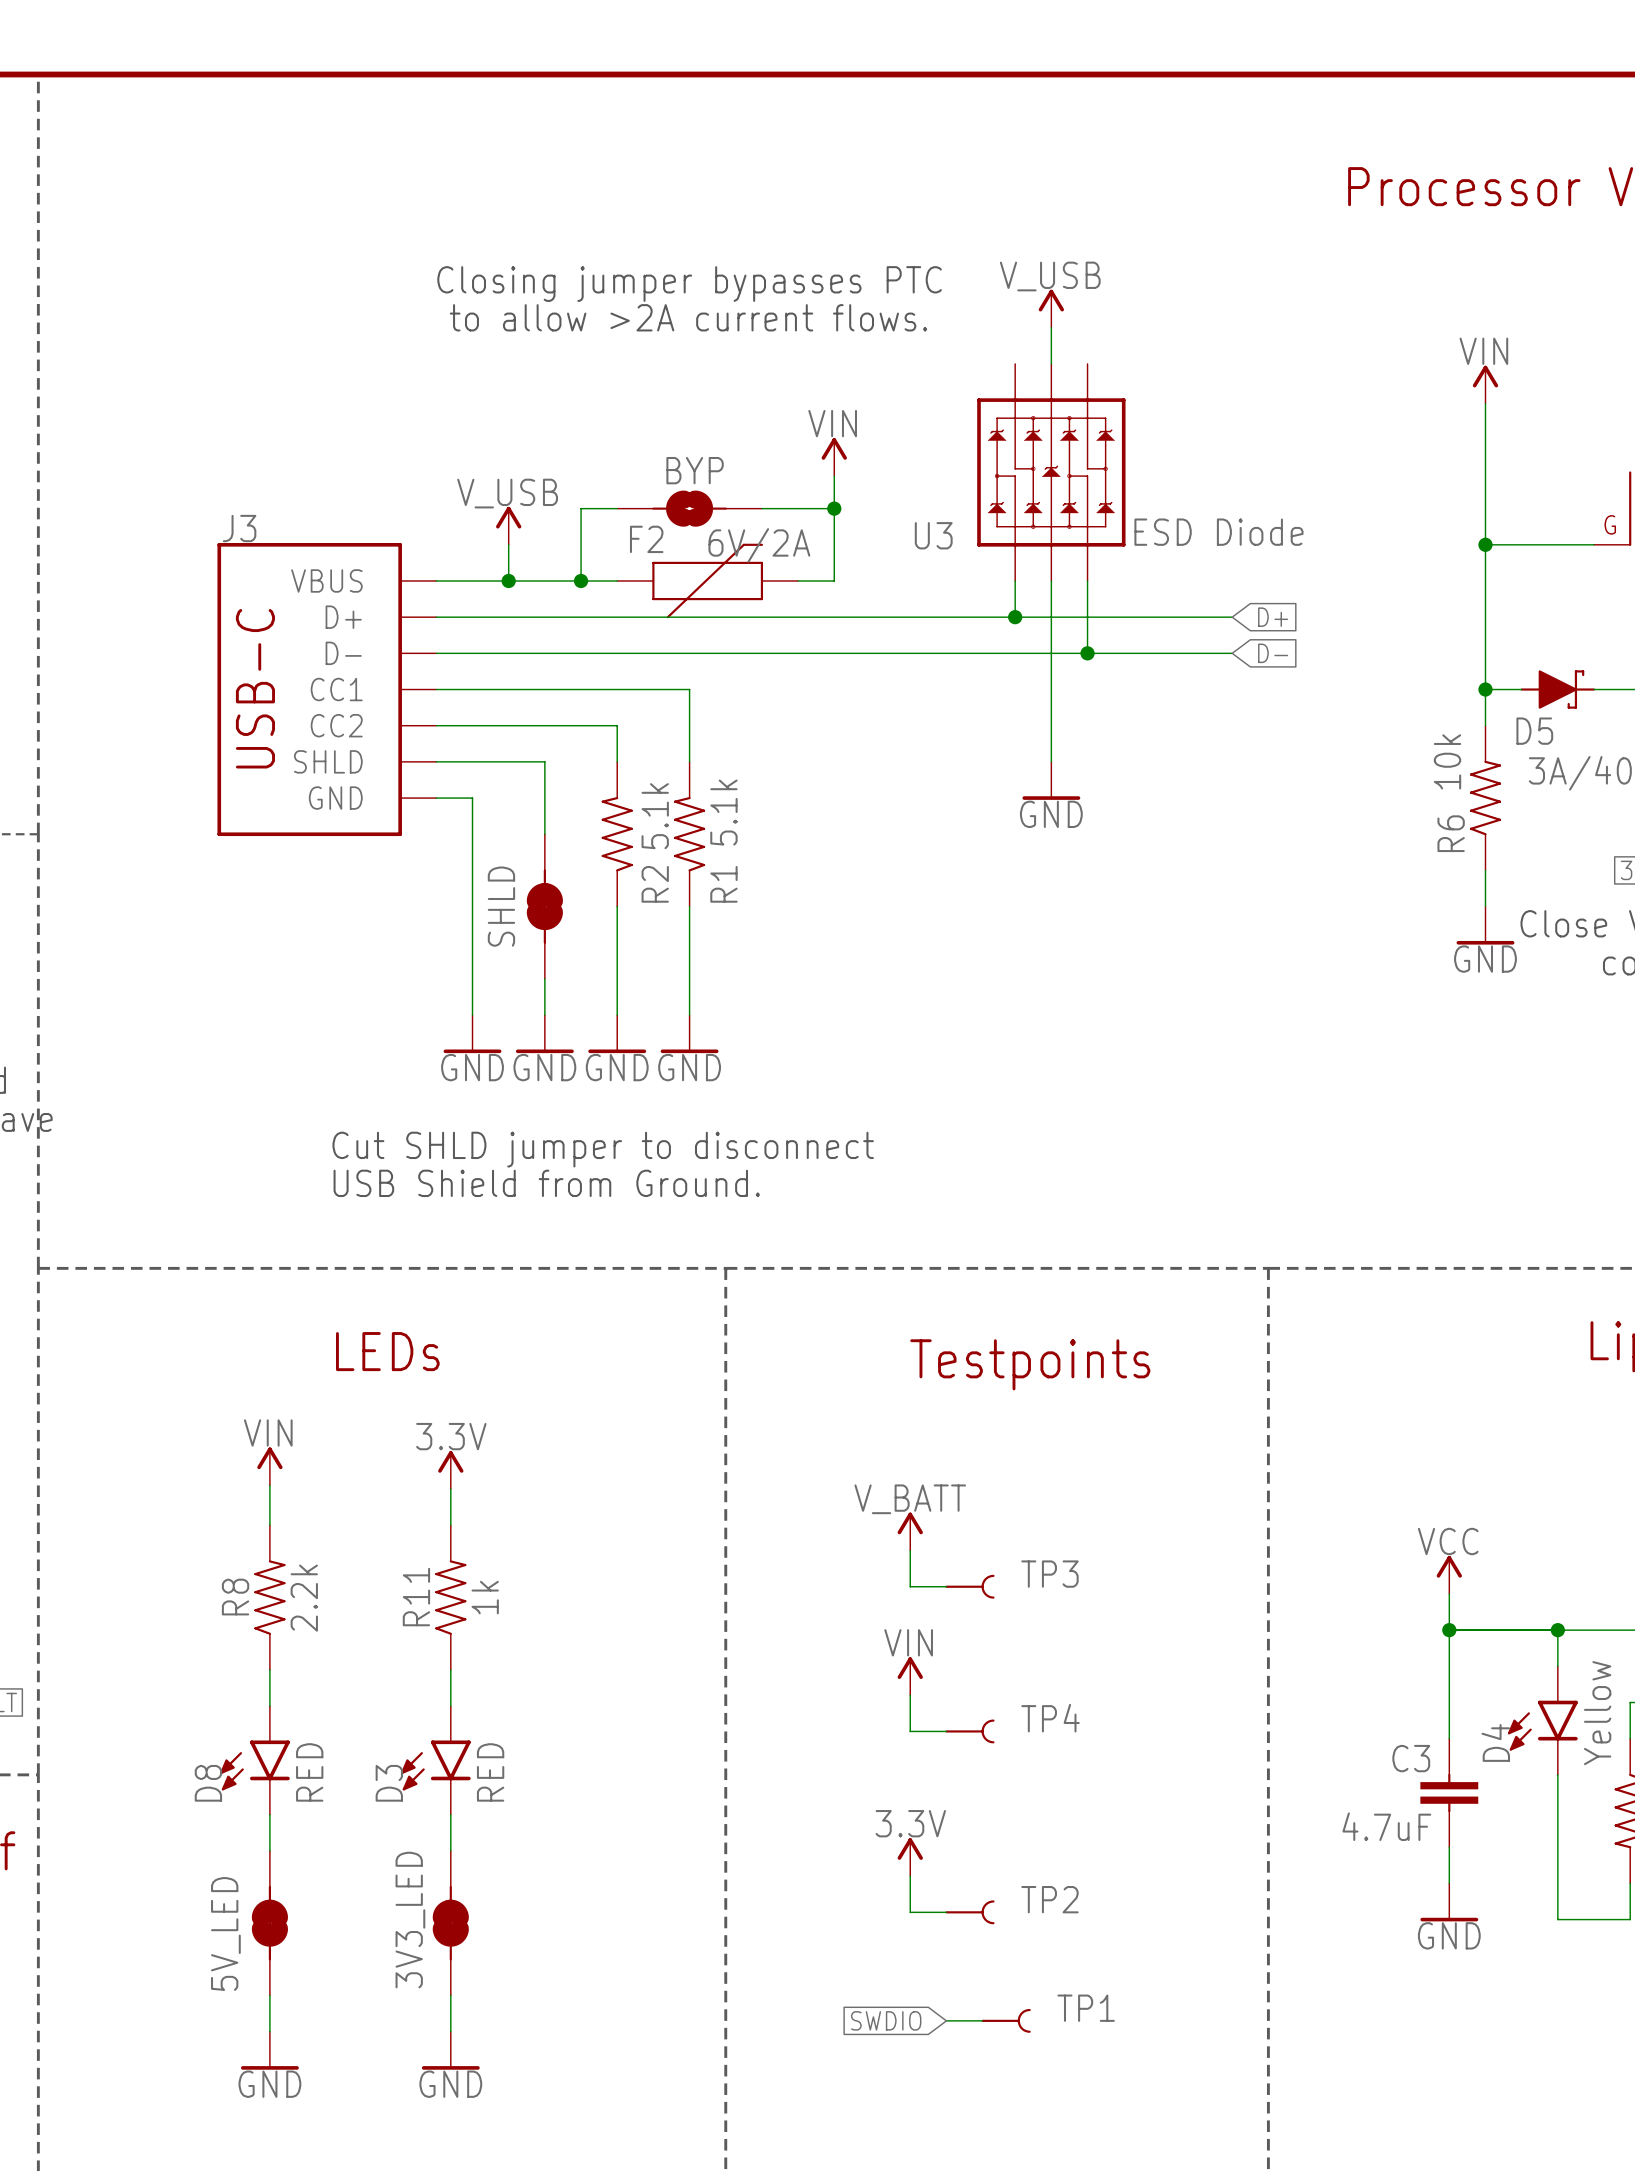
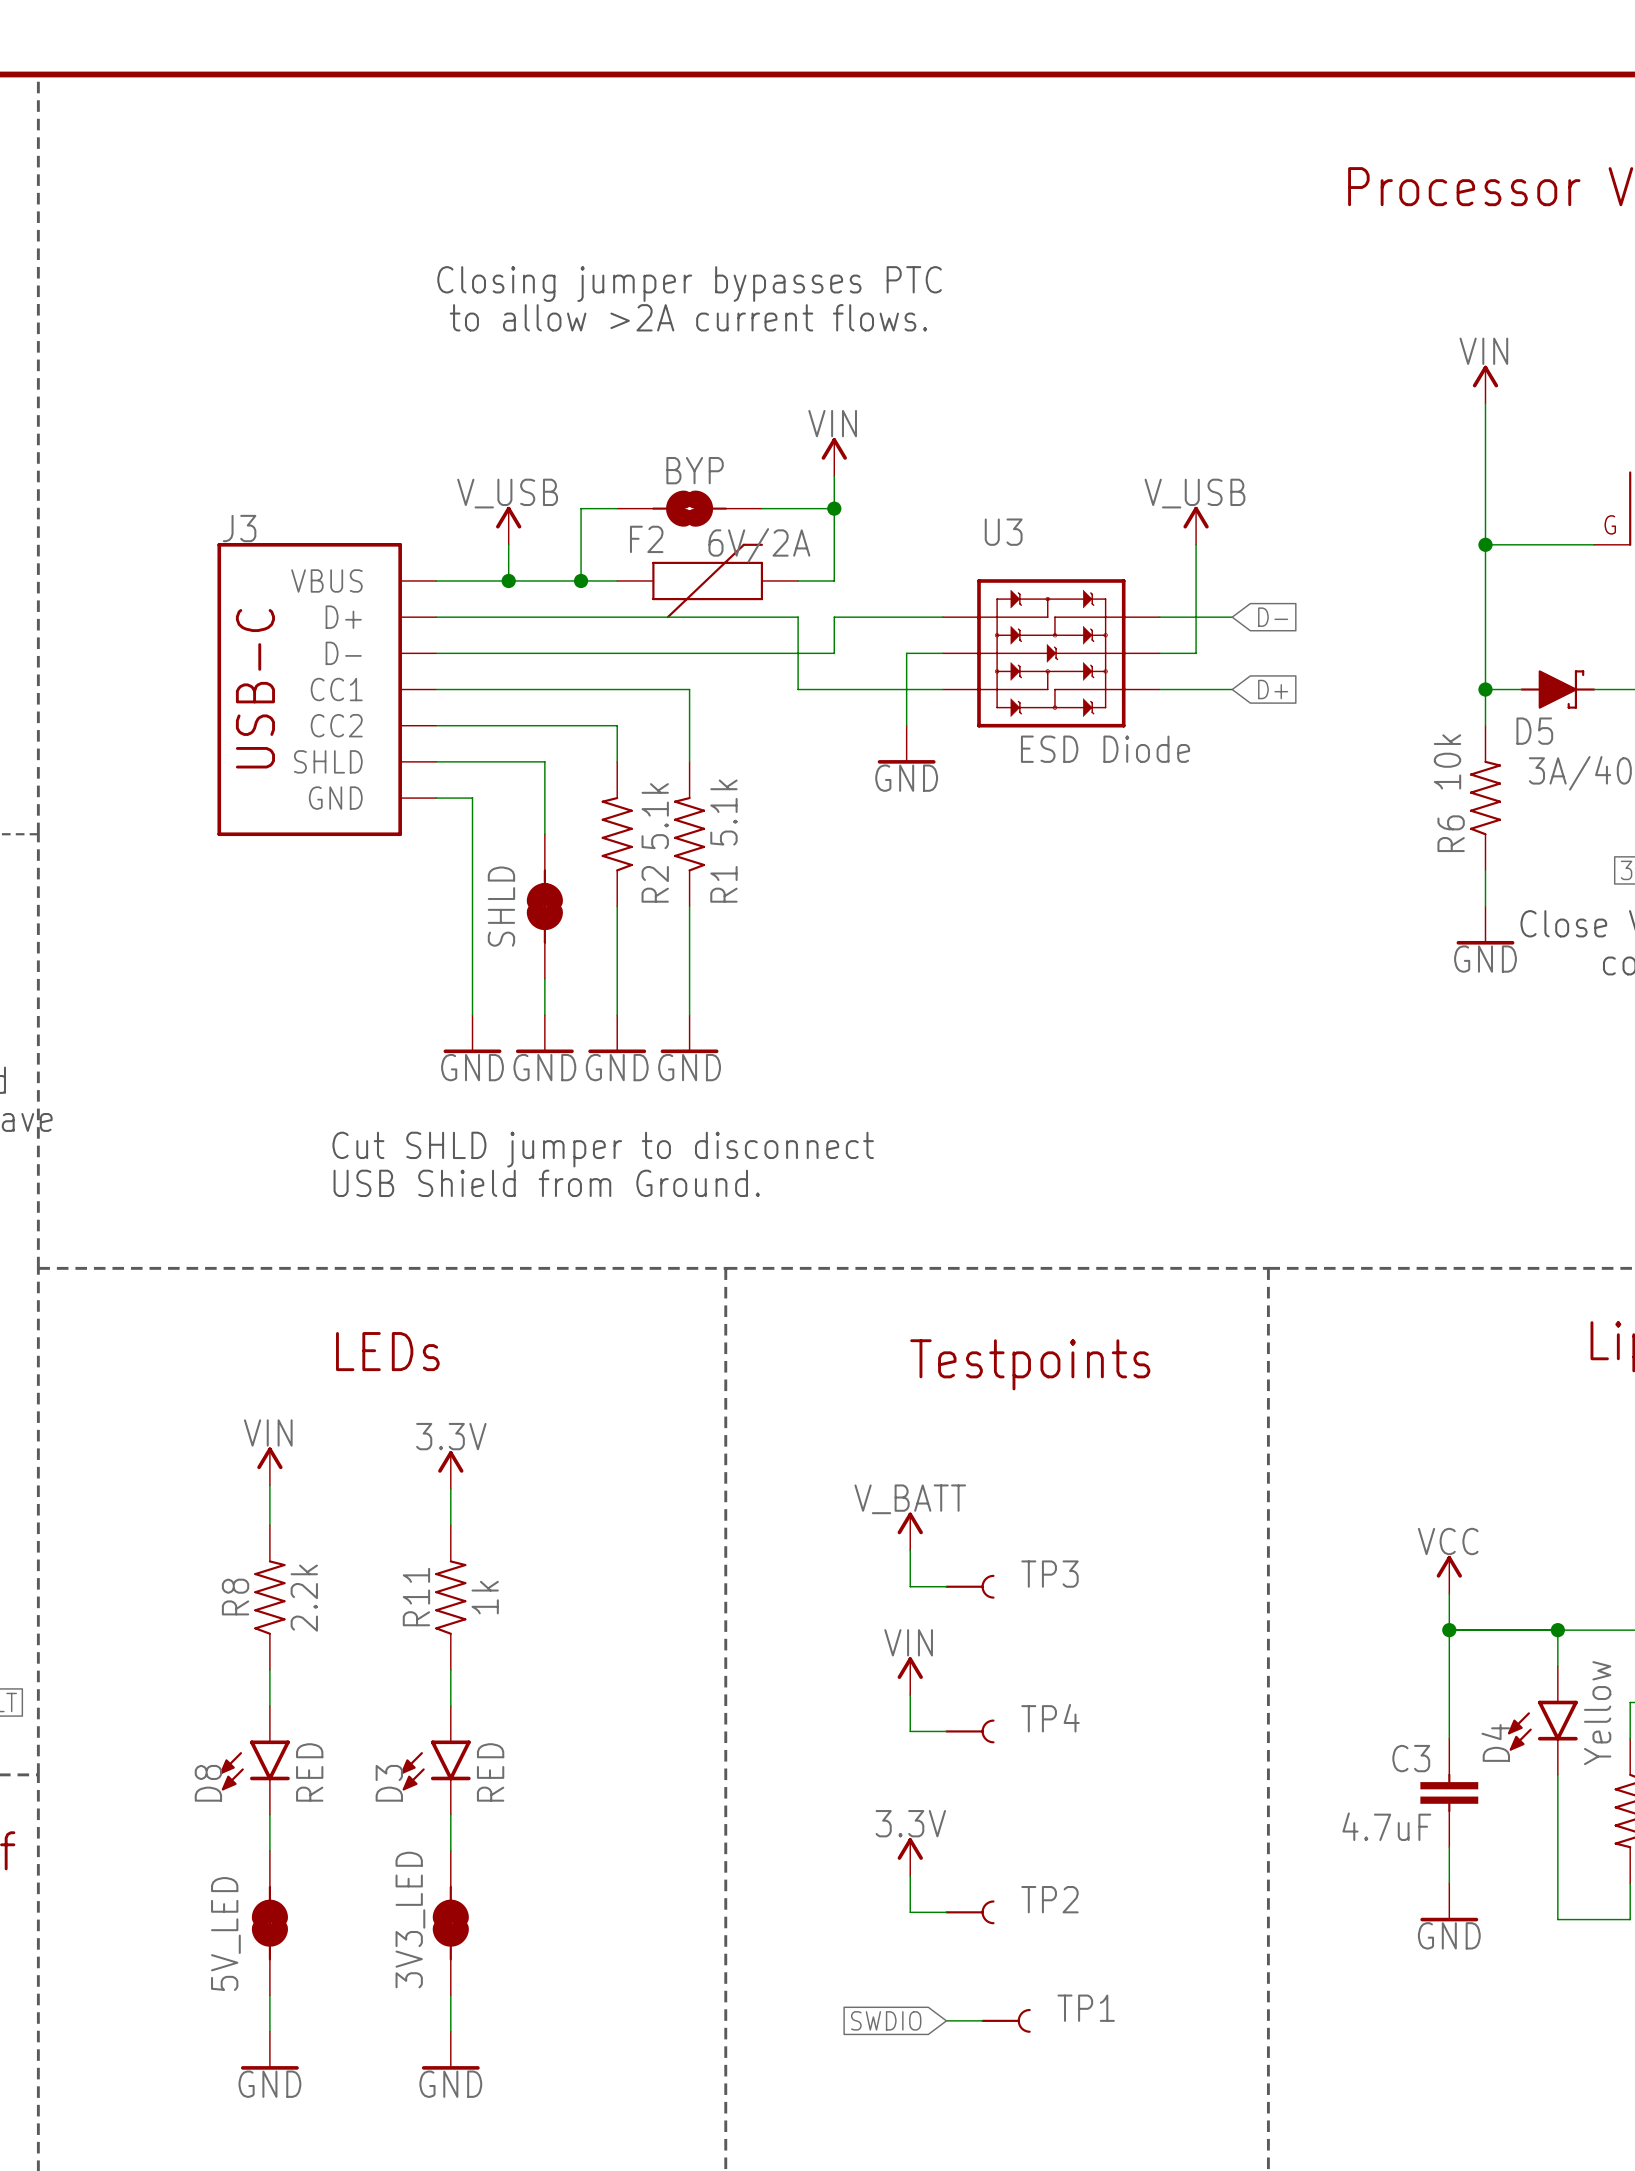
power symbol position: V_USB (1051, 308) -> V_USB (1196, 525)
wire: (1051, 327) (1051, 363) -> none
U3 rotation: 0° (1051, 472) -> 90° clockwise (1051, 653)
U3 position: (1051, 472) -> (1051, 653)
U3 value position: ESD Diode (1218, 532) -> ESD Diode (1105, 749)
wire: (1015, 580) (1015, 617) -> none
wire: (1051, 580) (1051, 761) -> none
wire: (1087, 580) (1087, 653) -> none
wire: (798, 617) (834, 617) -> (834, 653) (834, 617)
wire: none -> (798, 617) (798, 689) (942, 689)
junction: (1015, 617) -> none
global label: D+ (1273, 617) -> D- (1273, 617)
wire: (834, 653) (906, 653) -> (906, 725) (906, 653)
junction: (1087, 653) -> none
wire: (1196, 653) (1232, 653) -> (1196, 653) (1196, 544)
global label: D- (1273, 653) -> none
wire: none -> (1159, 689) (1232, 689)
global label: none -> D+ (1273, 689)
power symbol position: GND (1051, 780) -> GND (906, 744)

